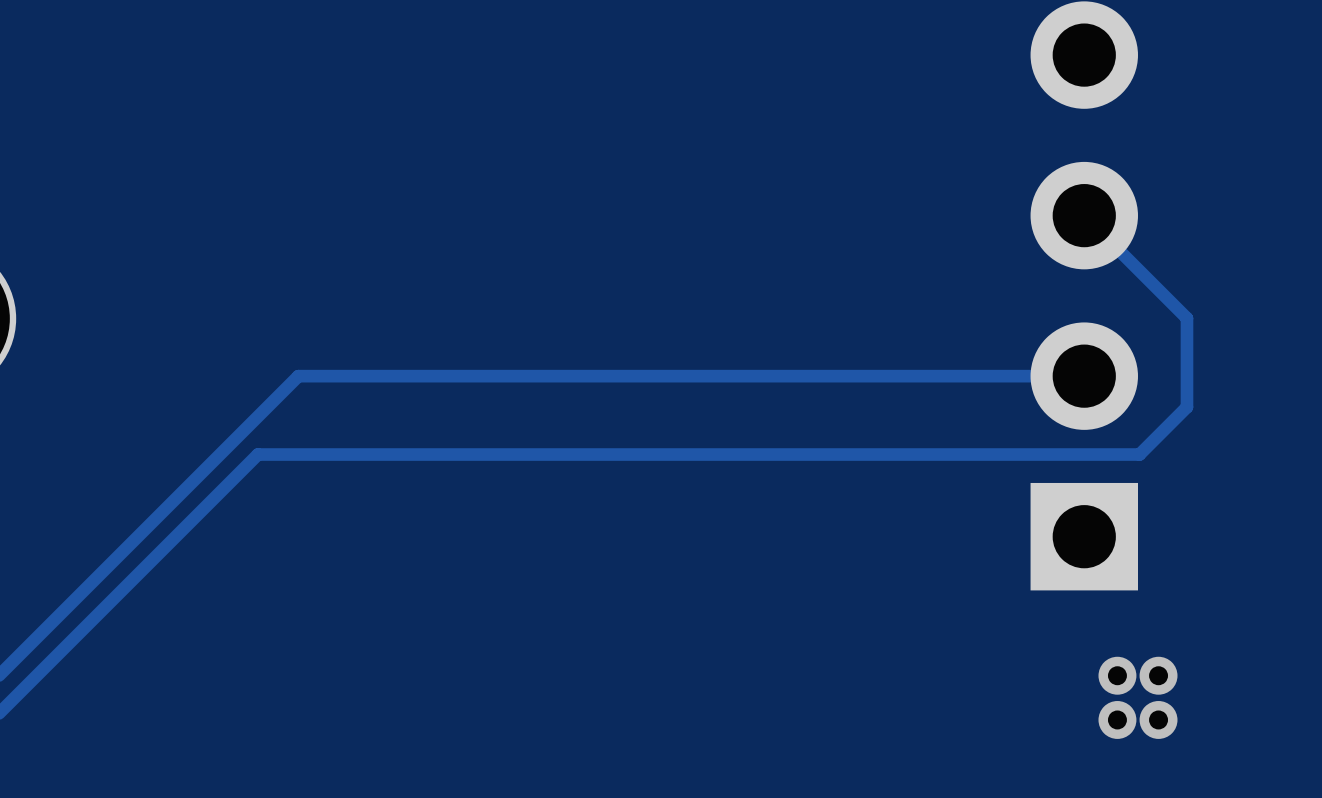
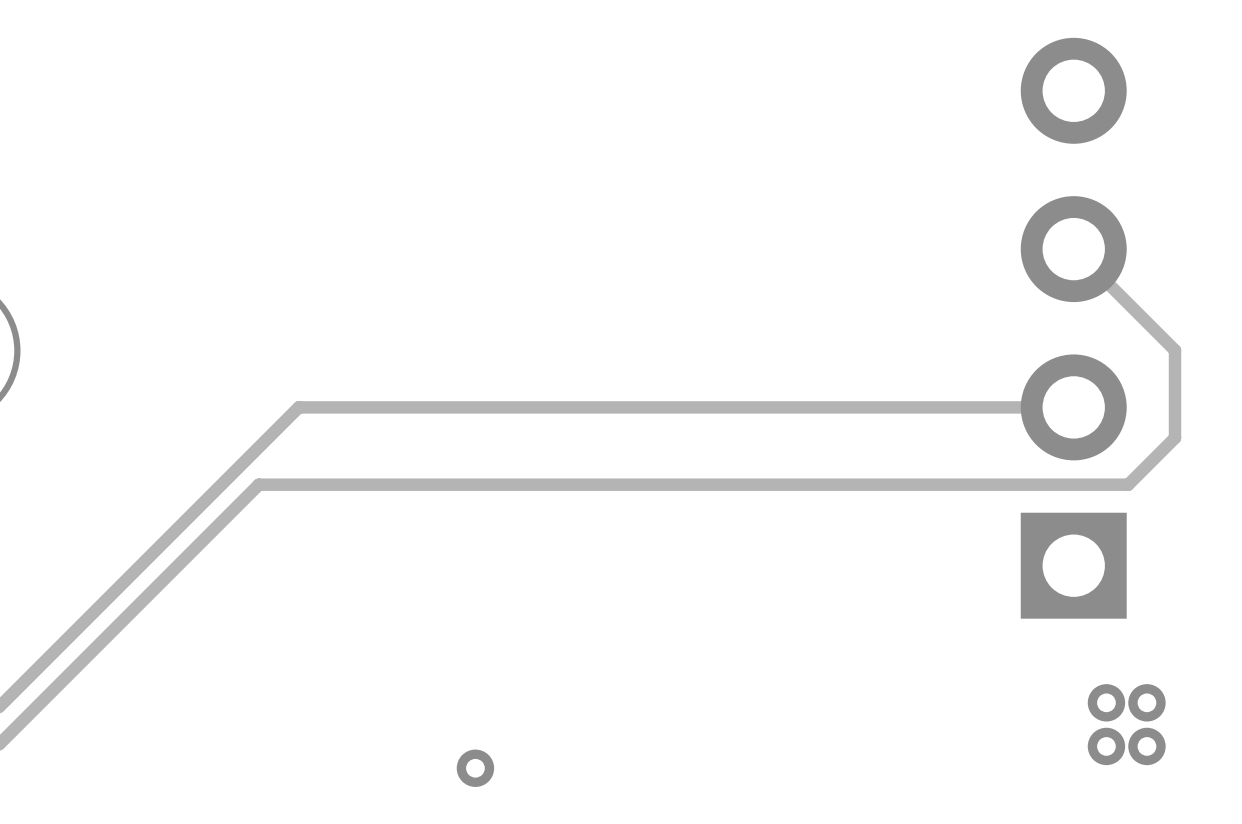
via: none -> (475, 768)

